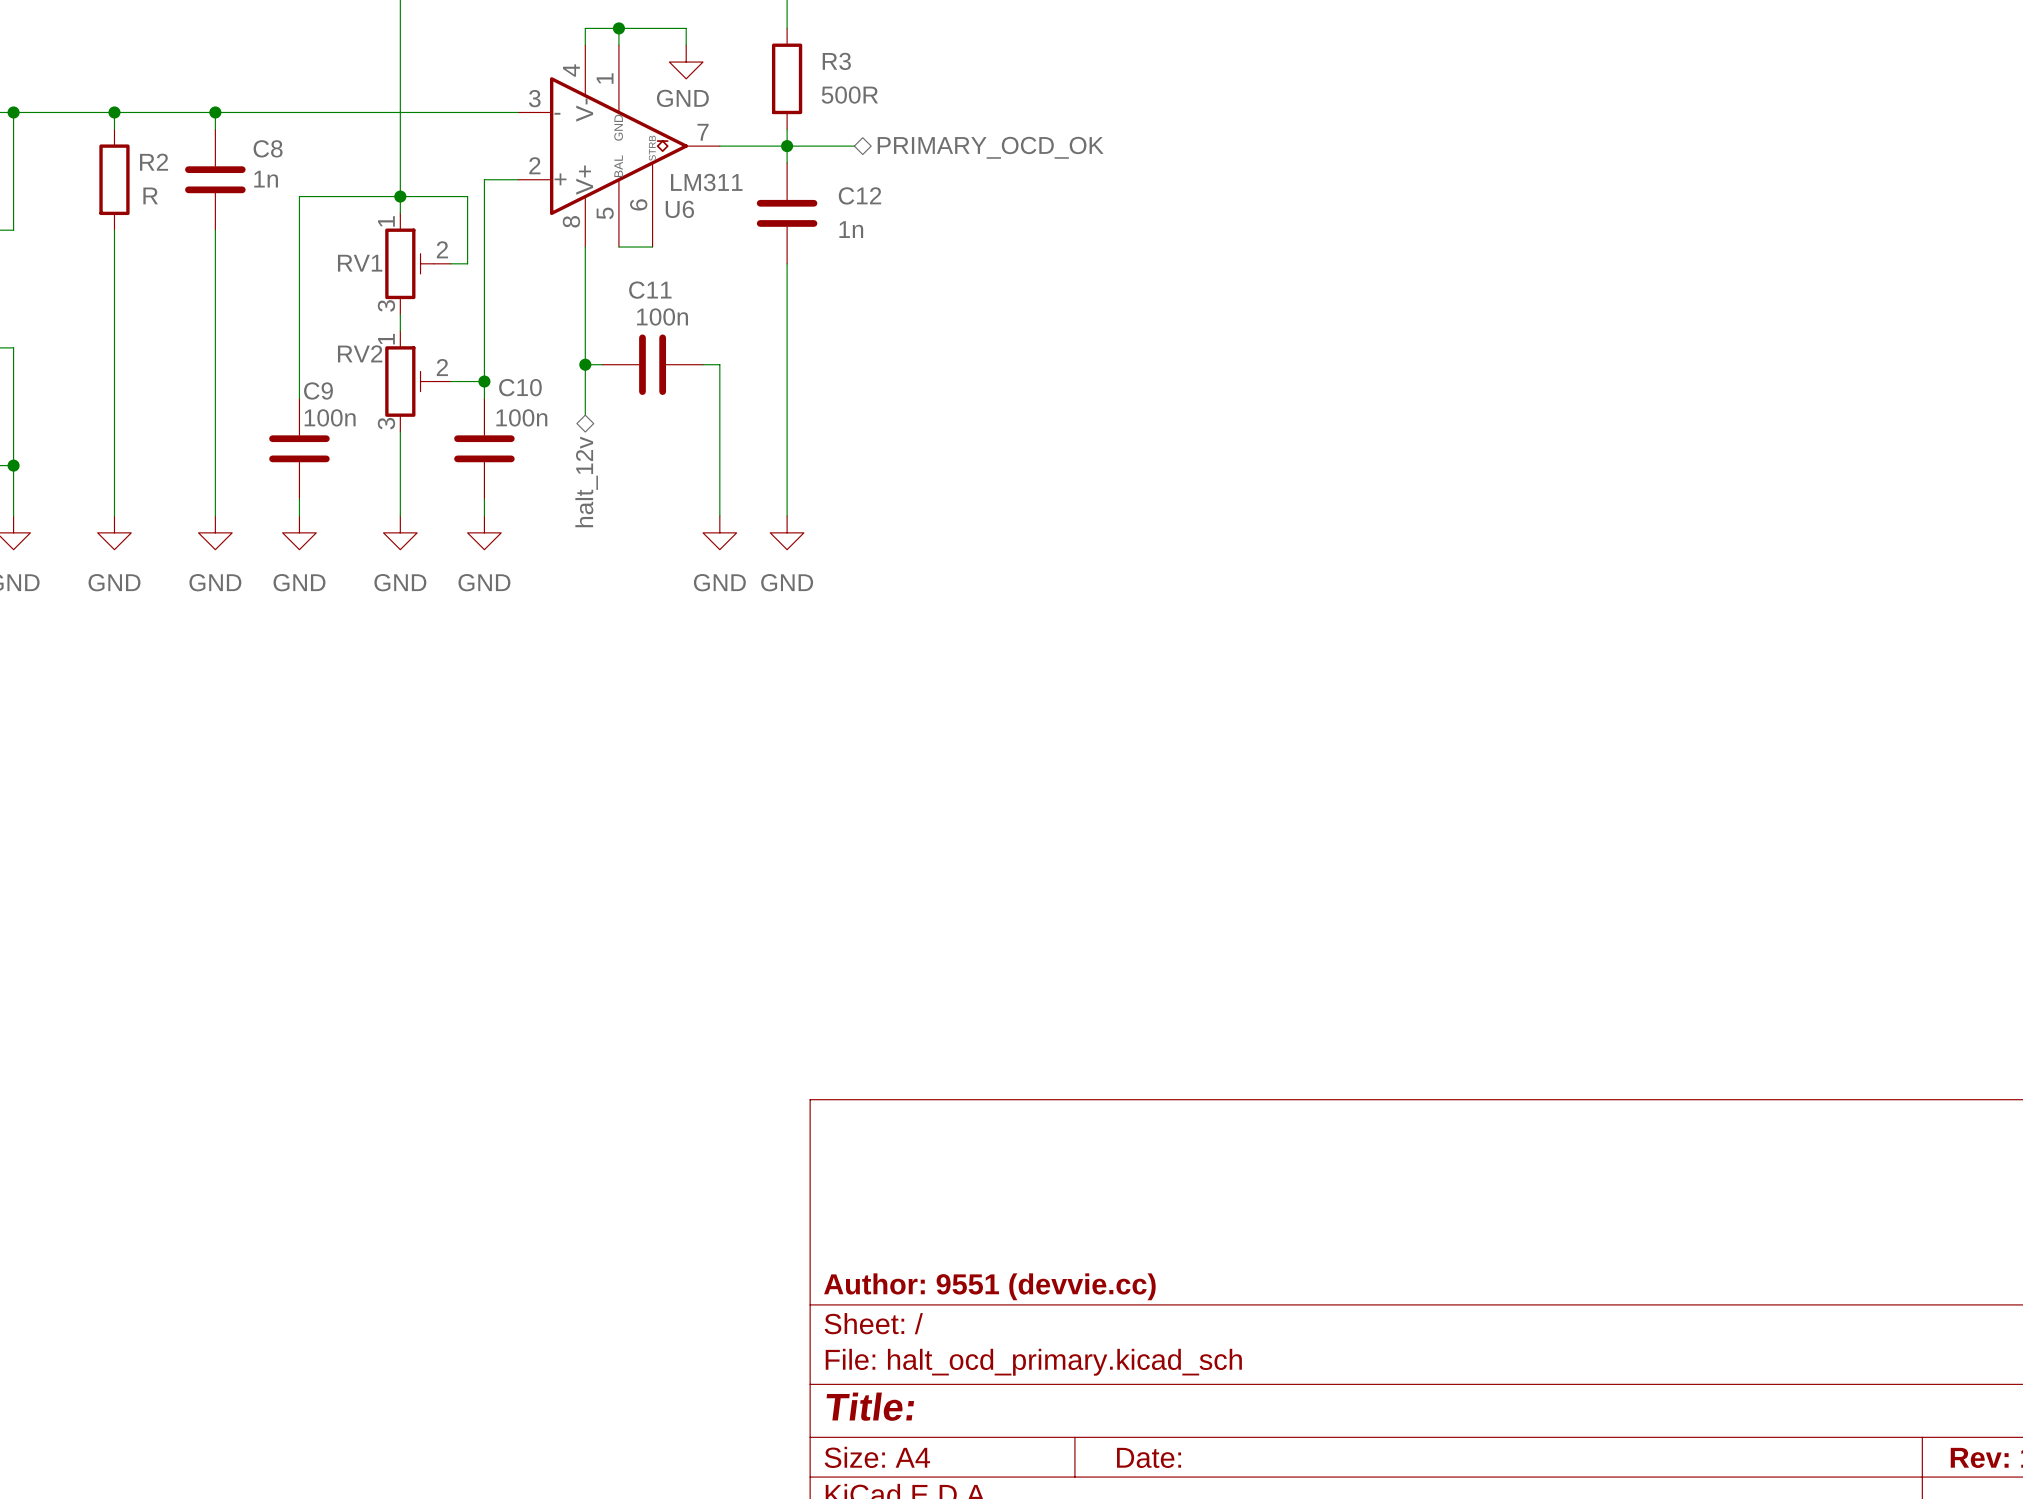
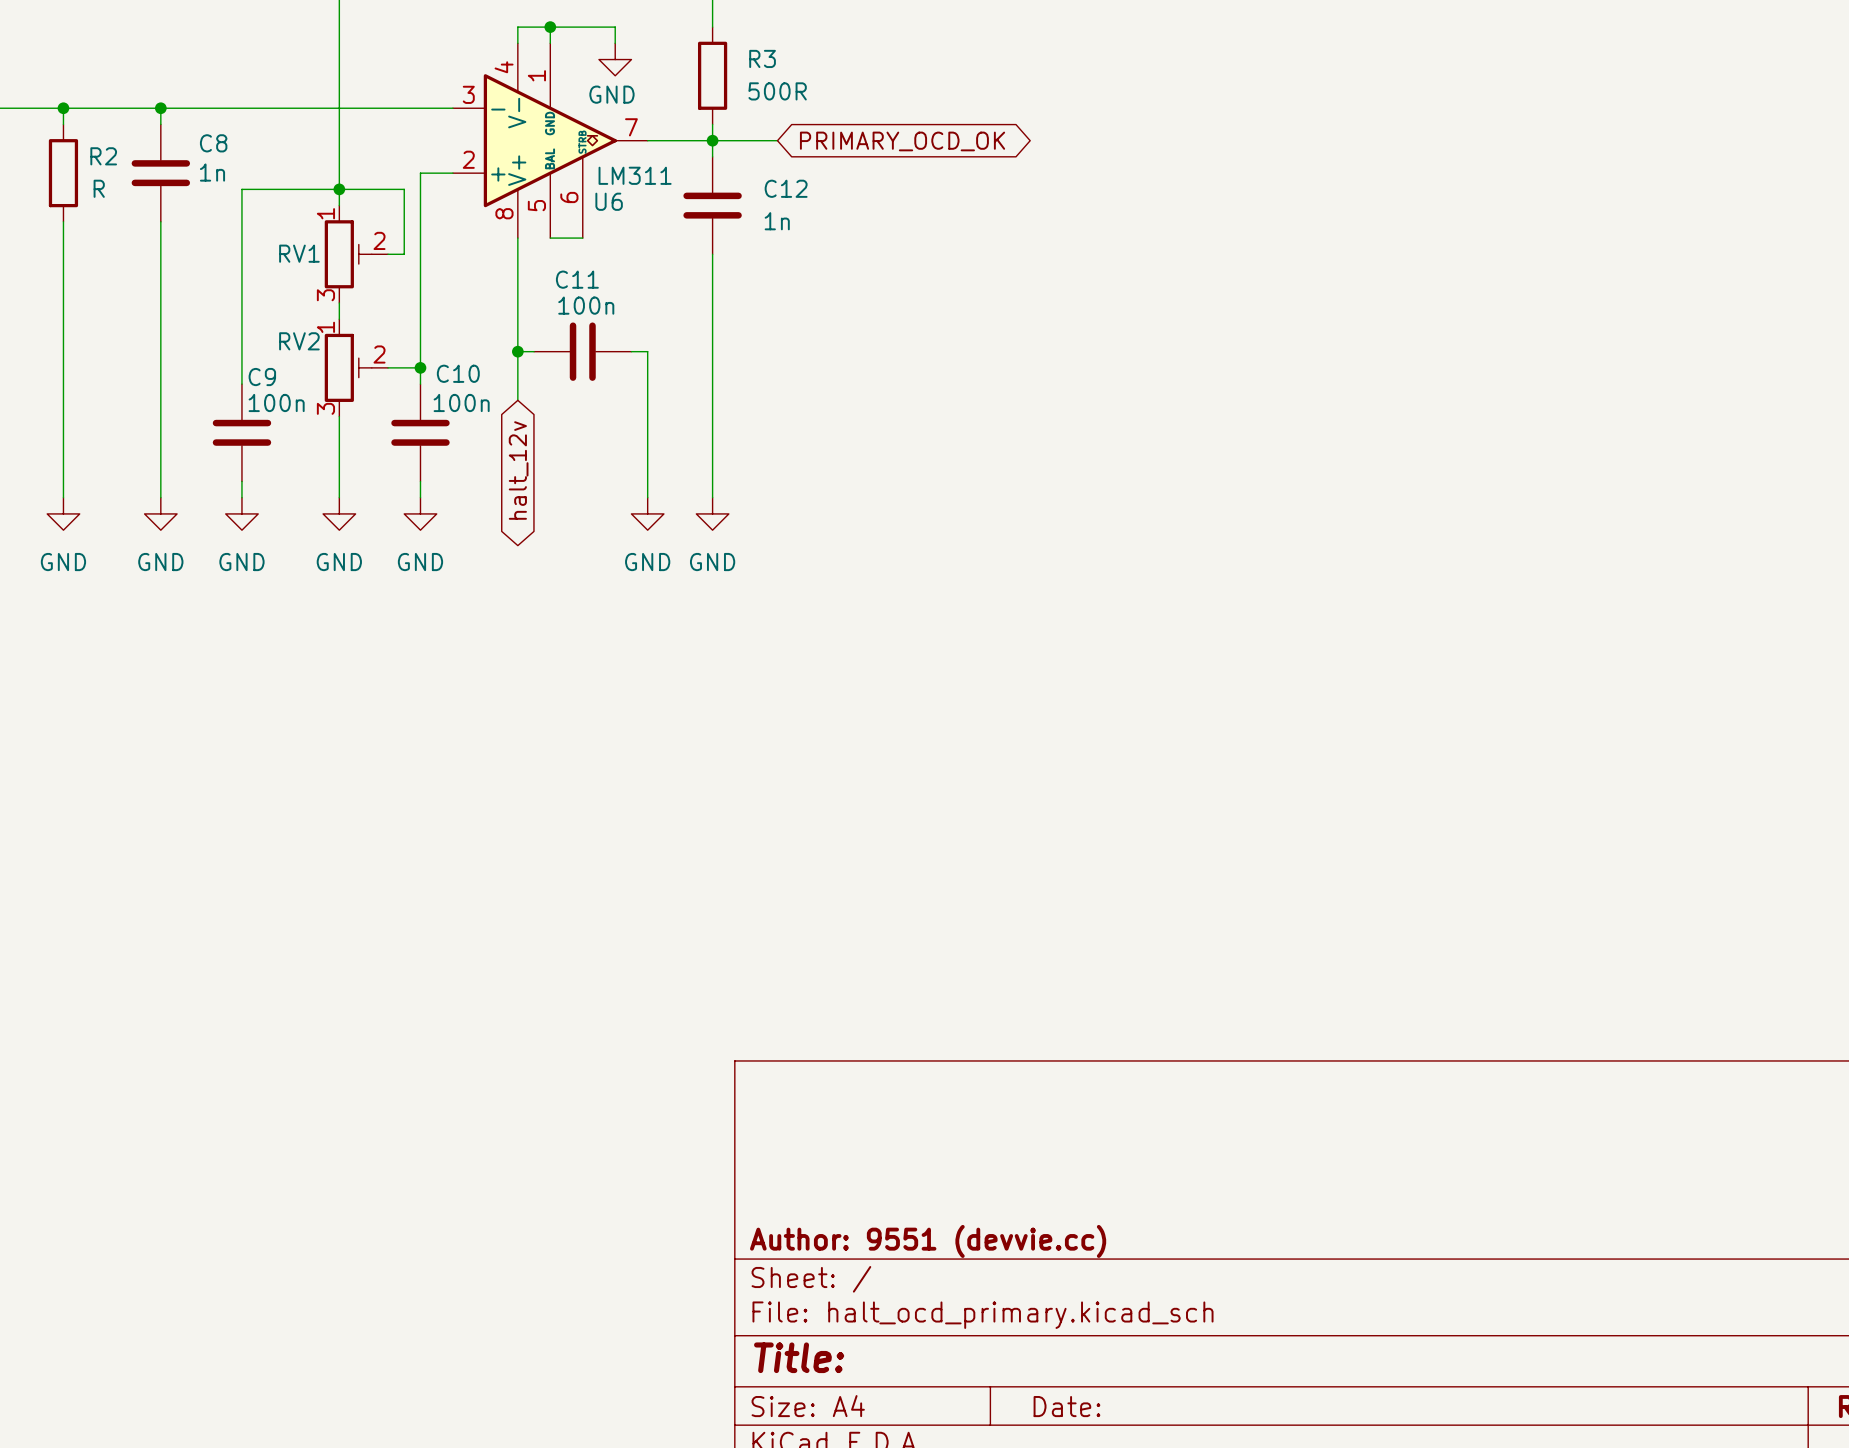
hierarchical label: PRIMARY_OCD_OK (990, 147) -> none
global label: none -> PRIMARY_OCD_OK (902, 141)
global label: none -> halt_12v (518, 470)
hierarchical label: halt_12v (586, 481) -> none

